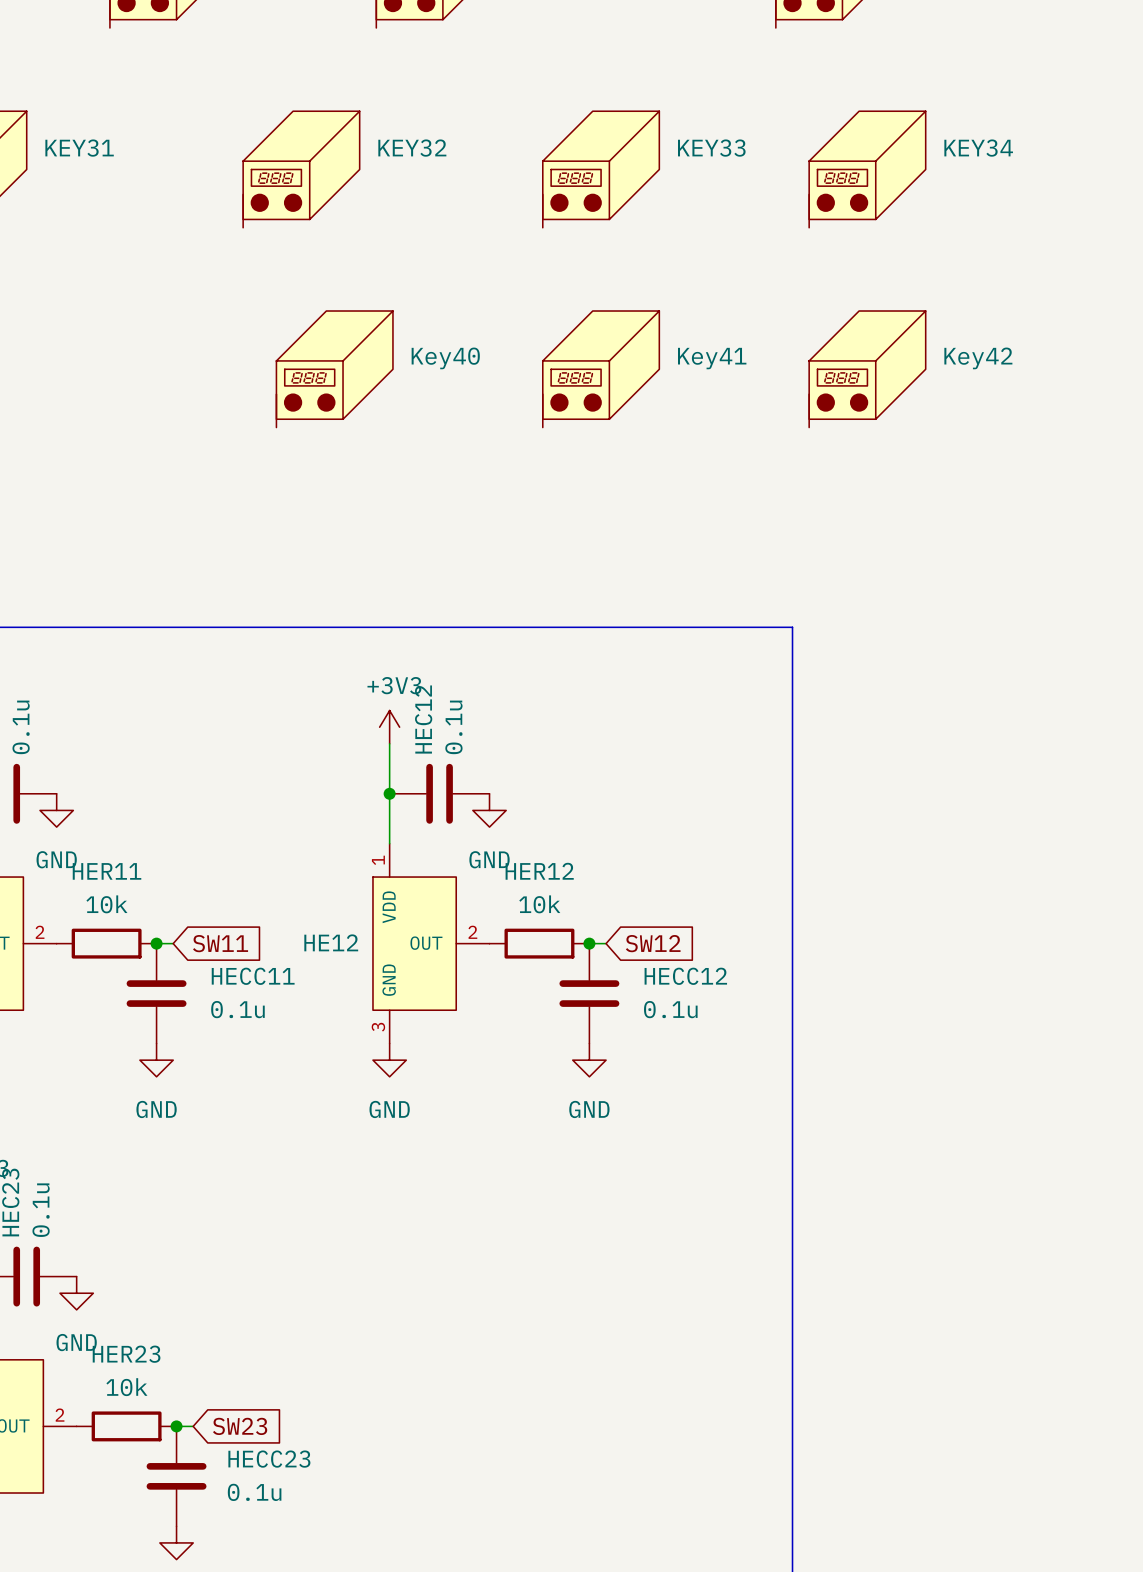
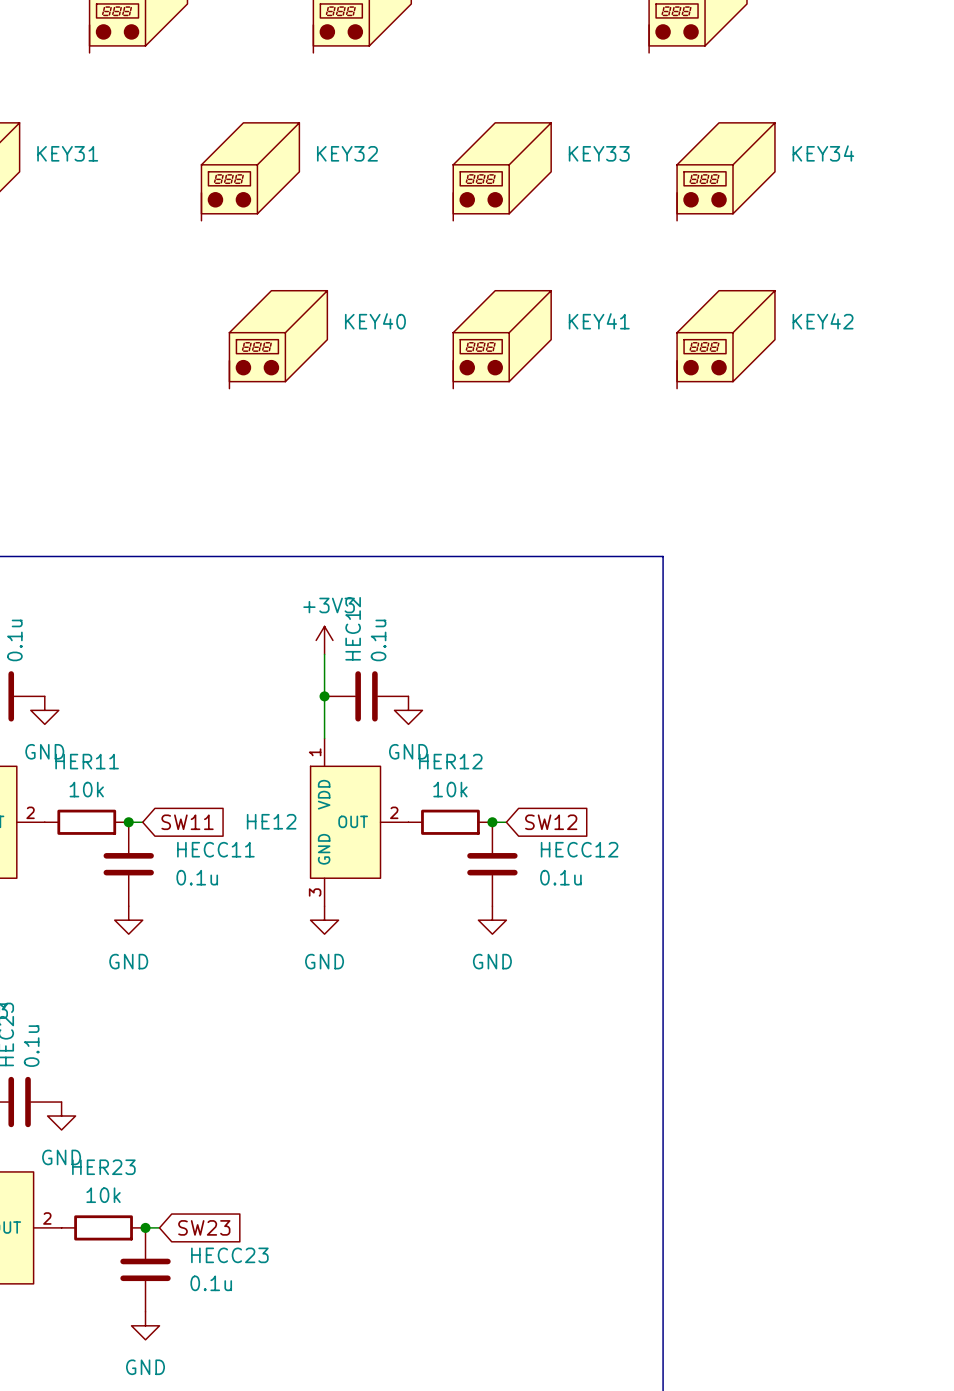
Key40 name: Key40 (445, 358) -> KEY40 (375, 321)
Key41 name: Key41 (712, 358) -> KEY41 (599, 321)
Key42 name: Key42 (978, 358) -> KEY42 (823, 321)

